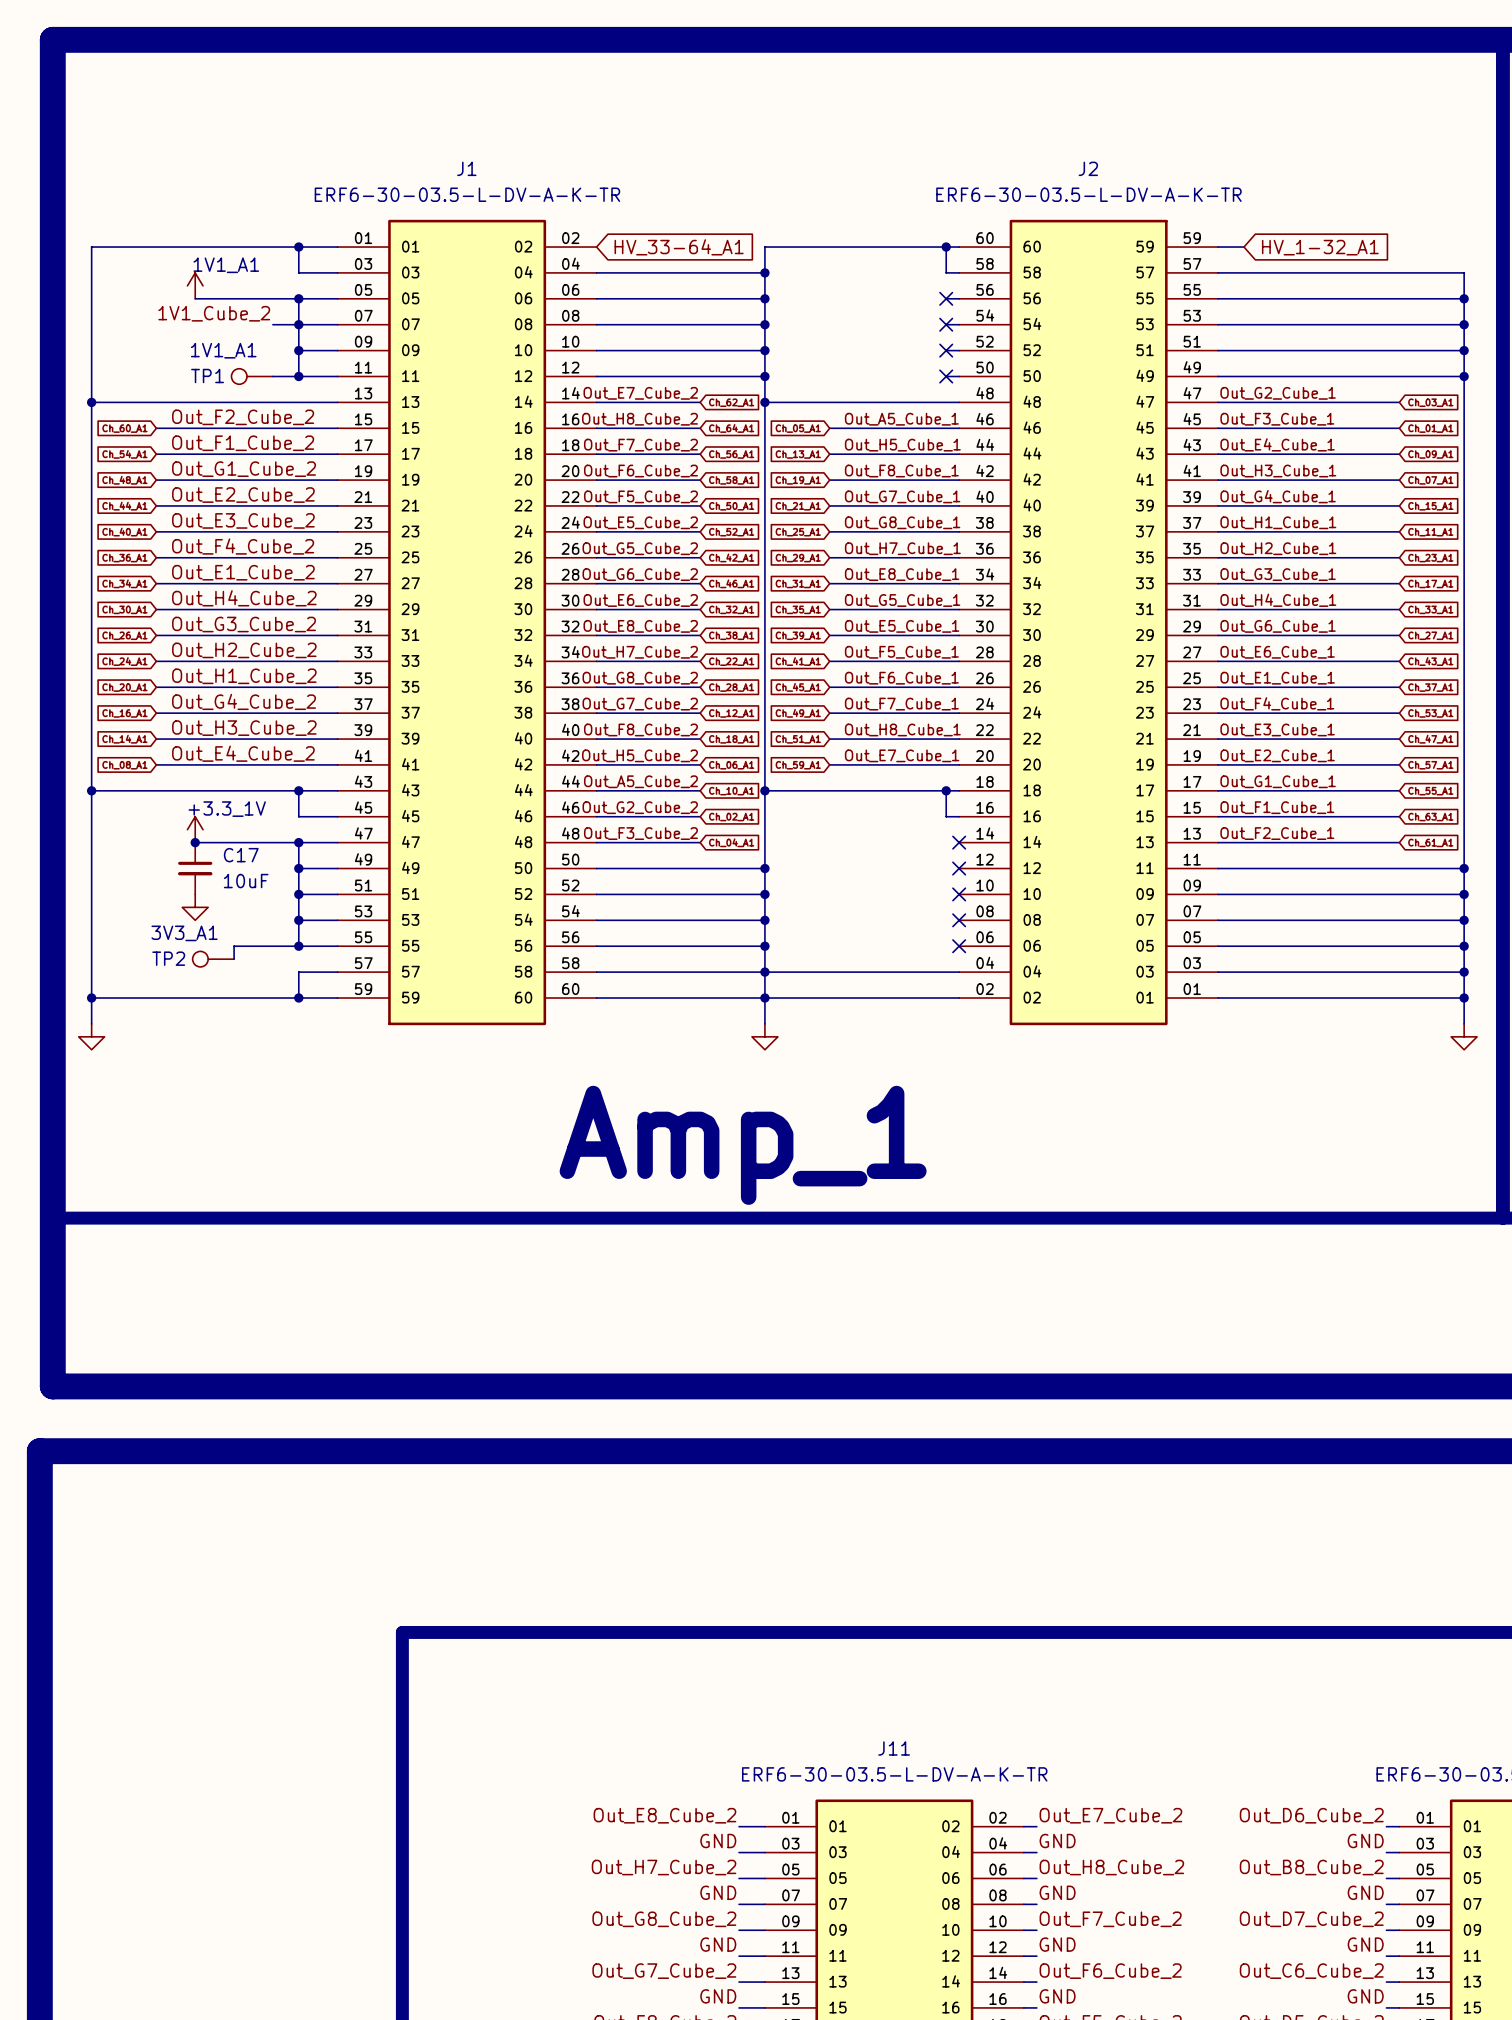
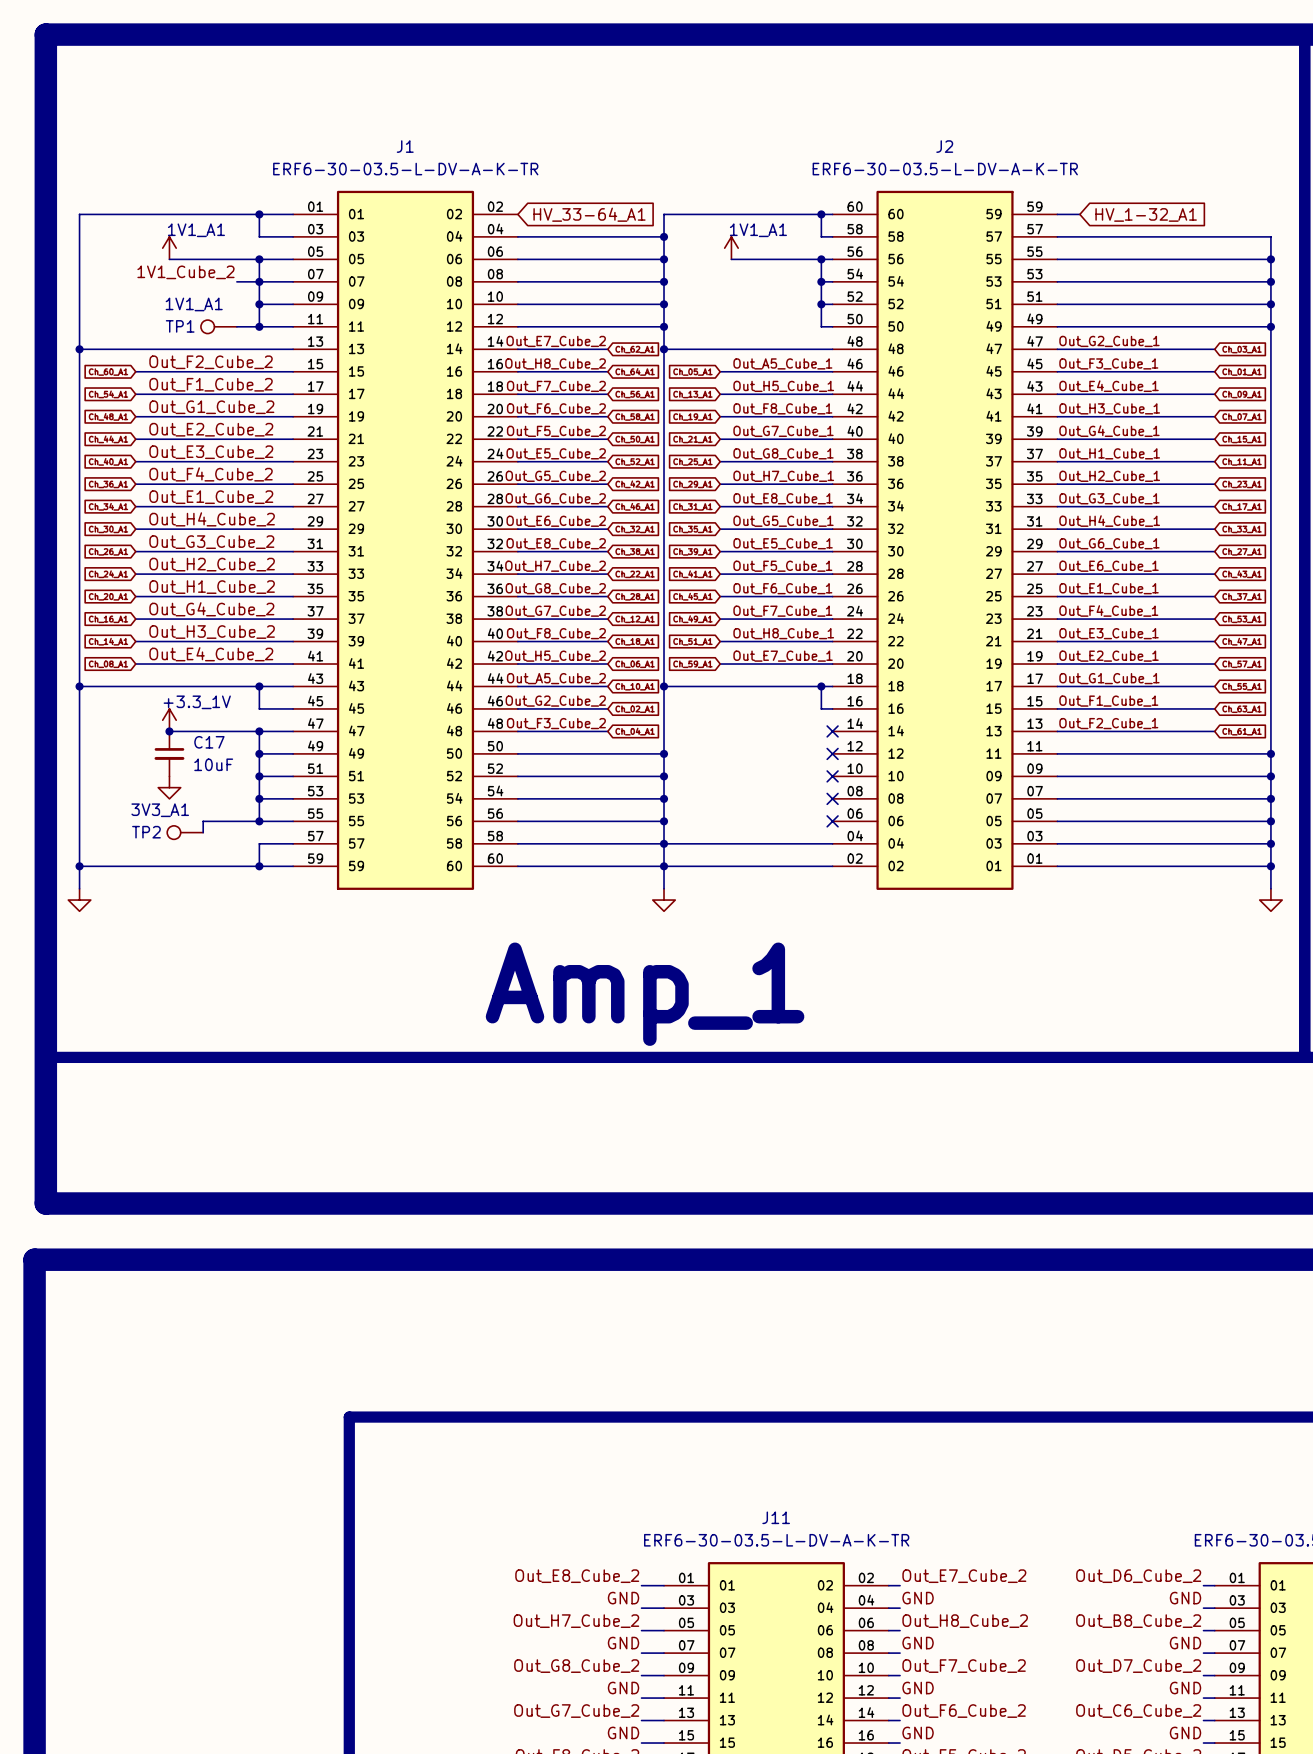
power symbol: none -> 1V1_A1 (731, 248)
wire: none -> (731, 259) (821, 259) (821, 326)
no-connect mark: (946, 298) -> none
junction: none -> (821, 259)
no-connect mark: (946, 324) -> none
junction: none -> (821, 281)
no-connect mark: (946, 350) -> none
junction: none -> (821, 304)
no-connect mark: (946, 376) -> none

